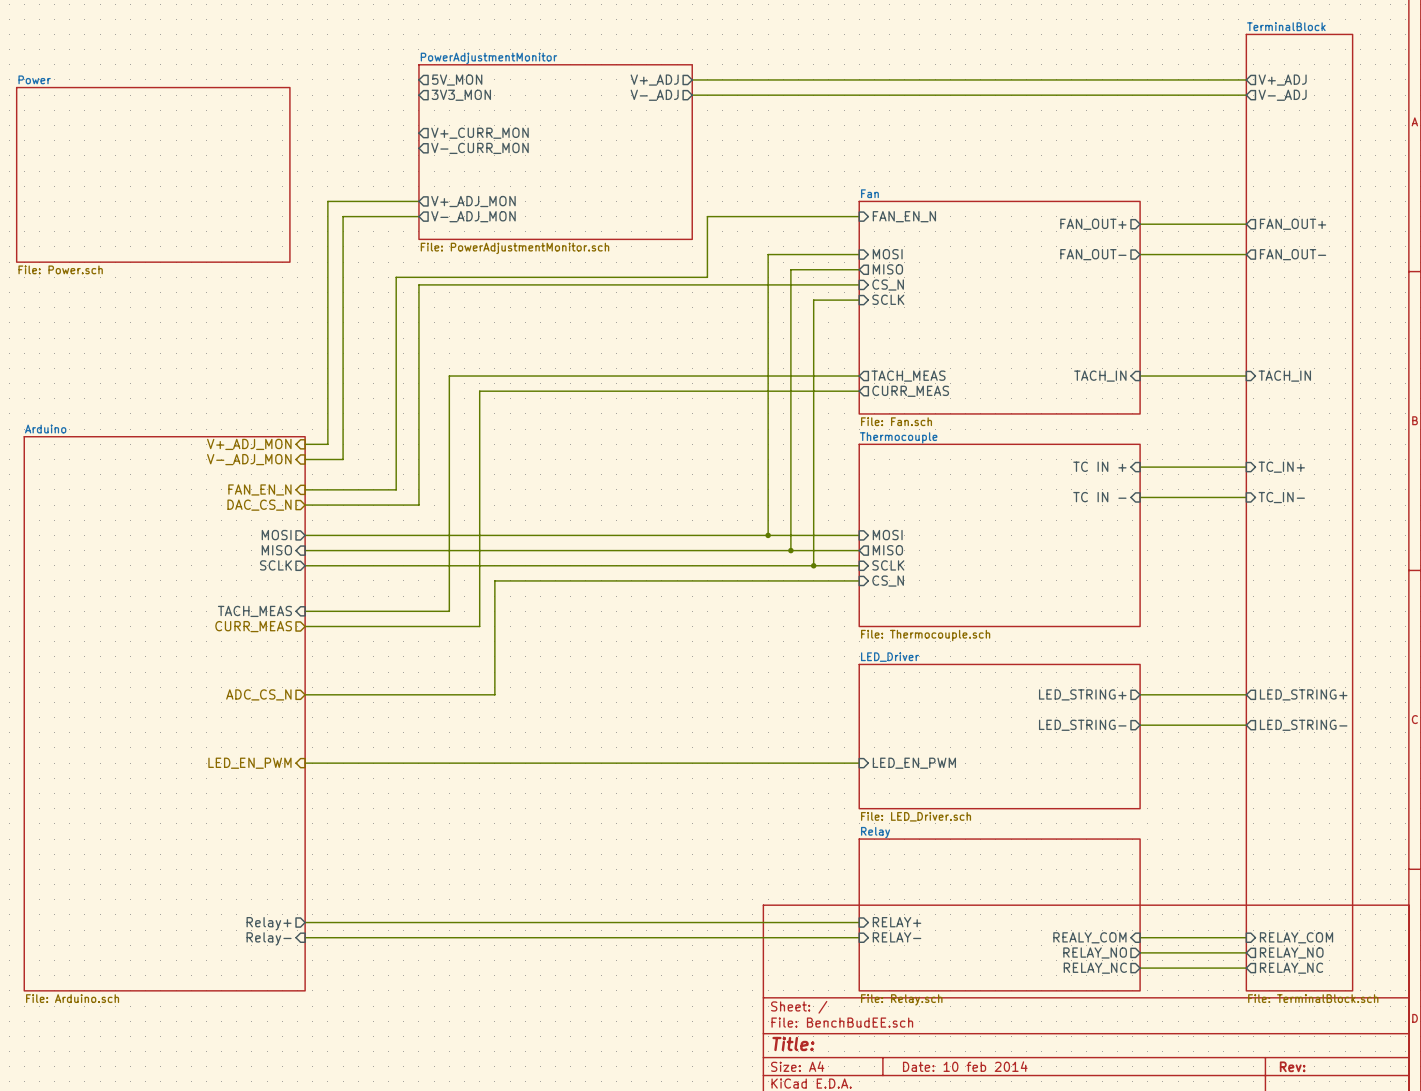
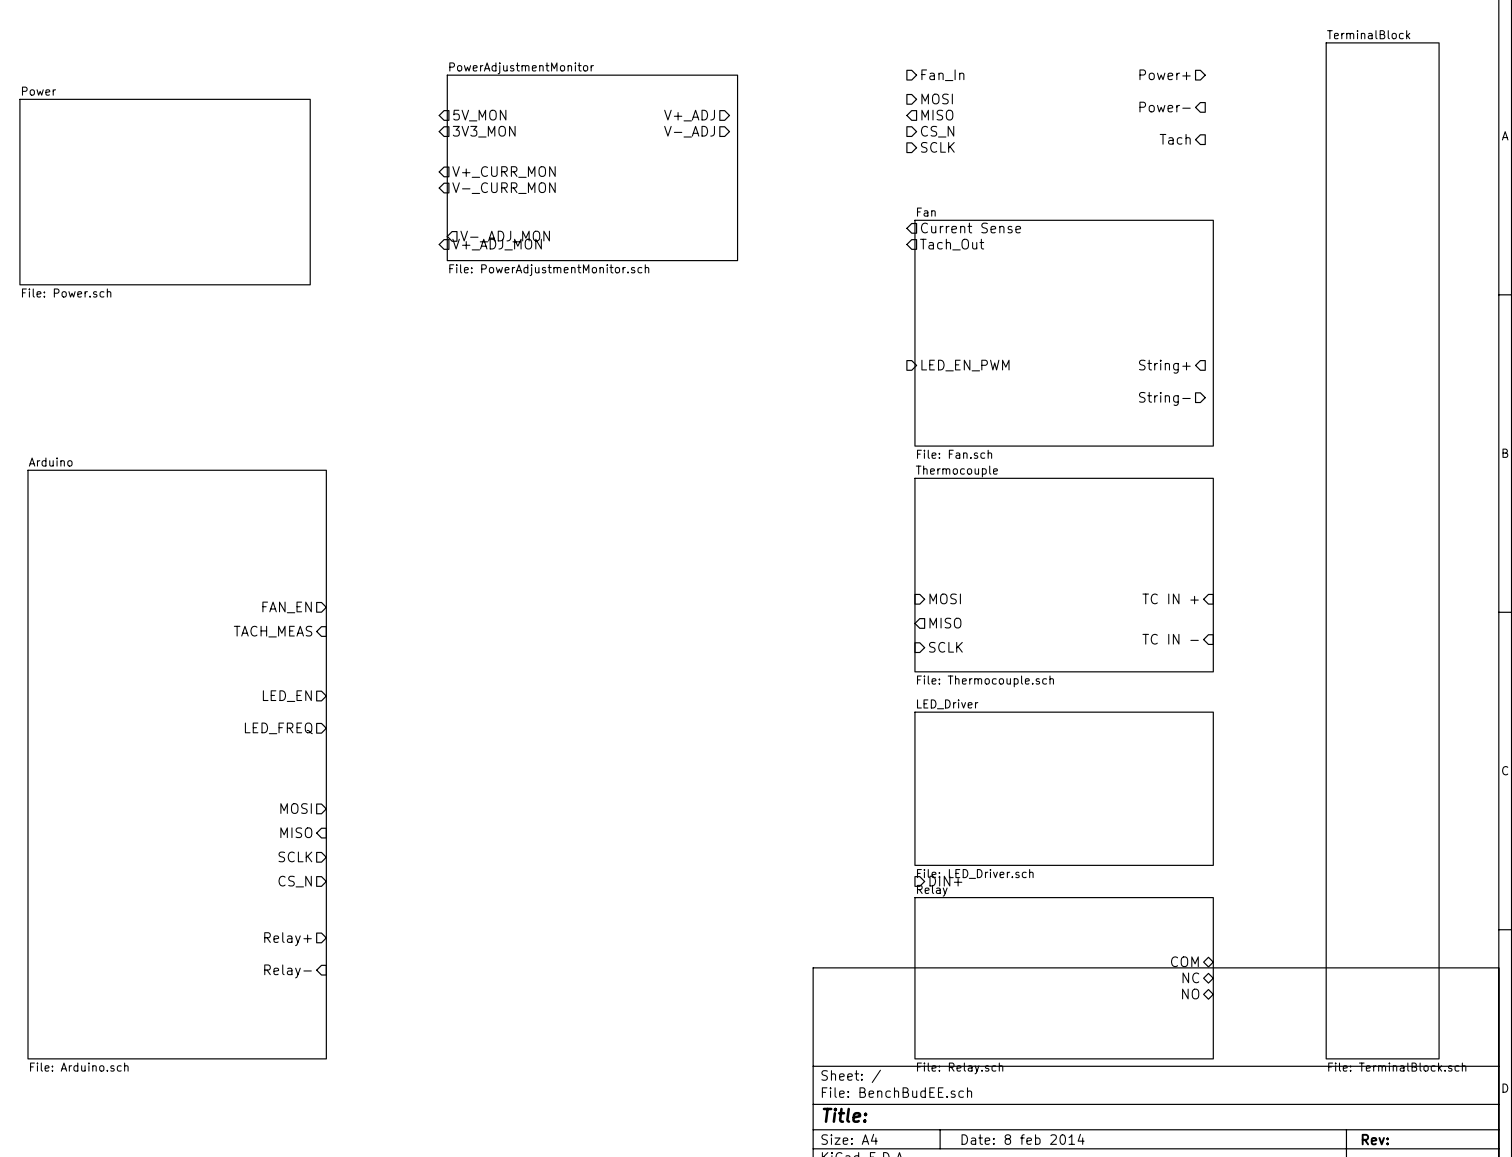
sheet pin: none -> Fan_In (942, 75)
sheet pin: none -> Power+ (1165, 74)
wire: (692, 79) (1246, 79) -> none
sheet pin position: 5V_MON (457, 80) -> 5V_MON (479, 115)
sheet pin position: V+_ADJ (654, 80) -> V+_ADJ (689, 115)
sheet pin: V+_ADJ (1282, 80) -> none
sheet pin: none -> MOSI (937, 98)
sheet pin: none -> Power- (1165, 107)
sheet pin position: 3V3_MON (461, 95) -> 3V3_MON (484, 131)
sheet pin position: V-_ADJ (654, 95) -> V-_ADJ (689, 131)
wire: (692, 95) (1246, 95) -> none
sheet pin: V-_ADJ (1282, 95) -> none
sheet pin: none -> MISO (937, 115)
sheet pin: none -> CS_N (937, 131)
sheet pin: none -> Tach (1175, 139)
sheet pin: none -> SCLK (937, 147)
sheet pin position: V+_CURR_MON (479, 133) -> V+_CURR_MON (504, 172)
sheet pin position: V-_CURR_MON (479, 148) -> V-_CURR_MON (504, 188)
wire: (418, 201) (327, 201) (327, 444) (305, 444) -> none
sheet pin position: V+_ADJ_MON (473, 201) -> V+_ADJ_MON (497, 244)
sheet pin: none -> Current Sense (971, 227)
wire: (418, 216) (343, 216) (343, 459) (305, 459) -> none
wire: (859, 216) (707, 216) (707, 277) (396, 277) (396, 489) (305, 489) -> none
sheet pin: FAN_EN_N (904, 216) -> none
sheet pin: none -> Tach_Out (952, 244)
sheet pin: FAN_OUT+ (1093, 224) -> none
wire: (1140, 224) (1246, 224) -> none
sheet pin: FAN_OUT+ (1293, 224) -> none
wire: (859, 254) (768, 254) (768, 535) -> none
sheet pin: MOSI (887, 254) -> none
sheet pin: FAN_OUT- (1093, 254) -> none
wire: (1140, 254) (1246, 254) -> none
sheet pin: FAN_OUT- (1293, 254) -> none
wire: (859, 269) (790, 269) (790, 550) -> none
sheet pin: MISO (887, 269) -> none
wire: (859, 284) (418, 284) (418, 505) (305, 505) -> none
sheet pin: CS_N (888, 285) -> none
sheet pin: SCLK (888, 299) -> none
wire: (859, 300) (813, 300) (813, 565) -> none
sheet pin: none -> LED_EN_PWM (965, 365)
sheet pin: none -> String+ (1164, 366)
sheet pin: none -> String- (1164, 398)
wire: (859, 376) (449, 376) (449, 611) (305, 611) -> none
sheet pin: TACH_MEAS (908, 376) -> none
sheet pin: TACH_IN (1100, 376) -> none
wire: (1140, 376) (1246, 376) -> none
sheet pin: TACH_IN (1284, 376) -> none
wire: (859, 391) (479, 391) (479, 626) (305, 626) -> none
sheet pin: CURR_MEAS (910, 391) -> none
hierarchical label: V+_ADJ_MON (249, 444) -> none
hierarchical label: V-_ADJ_MON (249, 459) -> none
sheet pin position: TC IN + (1099, 466) -> TC IN + (1170, 598)
wire: (1140, 467) (1246, 467) -> none
sheet pin: TC_IN+ (1281, 467) -> none
hierarchical label: FAN_EN_N (259, 489) -> none
sheet pin position: TC IN - (1099, 497) -> TC IN - (1170, 639)
wire: (1140, 497) (1246, 497) -> none
sheet pin: TC_IN- (1281, 497) -> none
hierarchical label: DAC_CS_N (259, 505) -> none
sheet pin: MOSI (276, 535) -> none
wire: (305, 535) (859, 535) -> none
junction: (768, 535) -> none
sheet pin position: MOSI (887, 535) -> MOSI (945, 598)
sheet pin: MISO (276, 550) -> none
wire: (305, 550) (859, 550) -> none
junction: (790, 550) -> none
sheet pin: MISO (887, 550) -> none
sheet pin: SCLK (275, 565) -> FAN_EN (287, 607)
wire: (305, 565) (859, 565) -> none
junction: (813, 565) -> none
sheet pin position: SCLK (888, 565) -> SCLK (945, 647)
wire: (859, 580) (494, 580) (494, 694) (305, 694) -> none
sheet pin shape: input (888, 581) -> output (945, 623)
sheet pin: CS_N (888, 581) -> MISO (945, 623)
sheet pin position: TACH_MEAS (254, 611) -> TACH_MEAS (273, 631)
hierarchical label: CURR_MEAS (253, 626) -> none
sheet pin: none -> LED_EN (287, 696)
sheet pin: none -> LED_FREQ (278, 728)
hierarchical label: ADC_CS_N (258, 694) -> none
sheet pin: LED_STRING+ (1082, 694) -> none
wire: (1140, 694) (1246, 694) -> none
sheet pin: LED_STRING+ (1303, 694) -> none
sheet pin: LED_STRING- (1082, 725) -> none
wire: (1140, 725) (1246, 725) -> none
sheet pin: LED_STRING- (1303, 725) -> none
sheet pin: none -> MOSI (296, 808)
hierarchical label: LED_EN_PWM (249, 763) -> none
wire: (305, 763) (859, 763) -> none
sheet pin: LED_EN_PWM (914, 763) -> none
sheet pin: none -> MISO (296, 832)
sheet pin: none -> SCLK (295, 856)
sheet pin: none -> CS_N (295, 881)
sheet pin: none -> DIN+ (945, 881)
sheet pin: none -> COM (1184, 961)
sheet pin: none -> NC (1190, 977)
wire: (305, 922) (859, 922) -> none
sheet pin: RELAY+ (897, 922) -> none
sheet pin position: Relay+ (269, 923) -> Relay+ (288, 939)
sheet pin: none -> NO (1190, 994)
wire: (305, 937) (859, 937) -> none
sheet pin: RELAY- (897, 937) -> none
sheet pin: REALY_COM (1089, 937) -> none
wire: (1140, 937) (1246, 937) -> none
sheet pin: RELAY_COM (1296, 937) -> none
sheet pin position: Relay- (269, 938) -> Relay- (288, 971)
sheet pin: RELAY_NO (1095, 952) -> none
wire: (1140, 952) (1246, 952) -> none
sheet pin: RELAY_NO (1291, 952) -> none
sheet pin: RELAY_NC (1095, 968) -> none
wire: (1140, 968) (1246, 968) -> none
sheet pin: RELAY_NC (1291, 968) -> none
title block: Date: 10 feb 2014 (965, 1066) -> Date: 8 feb 2014 (1023, 1139)

